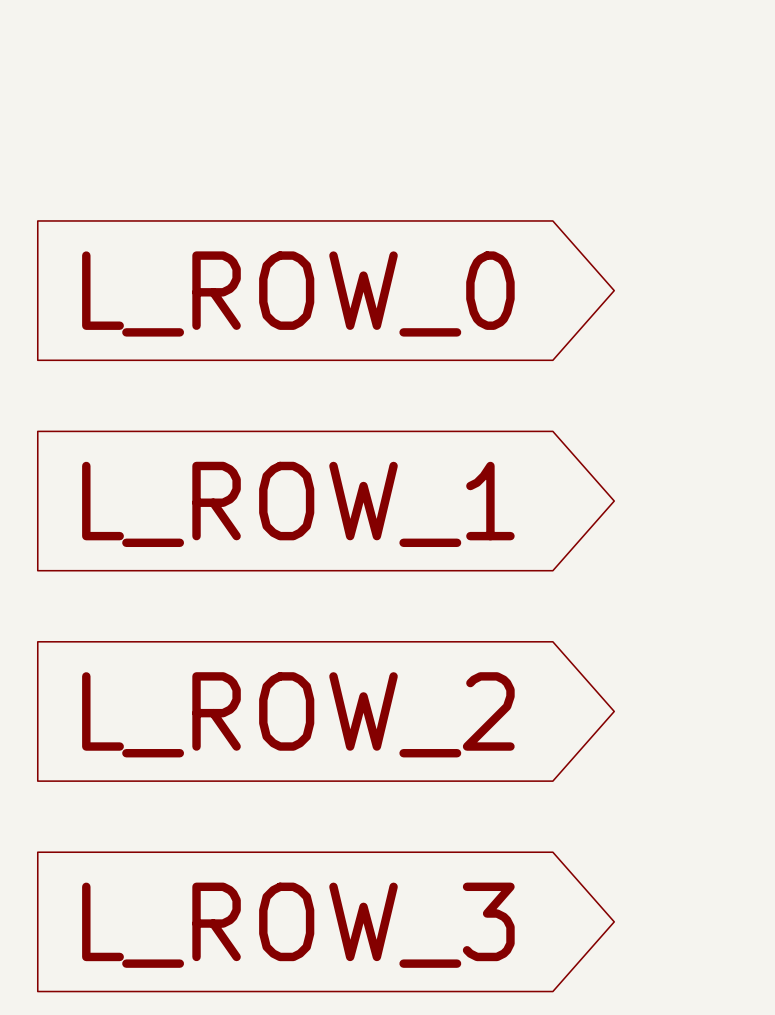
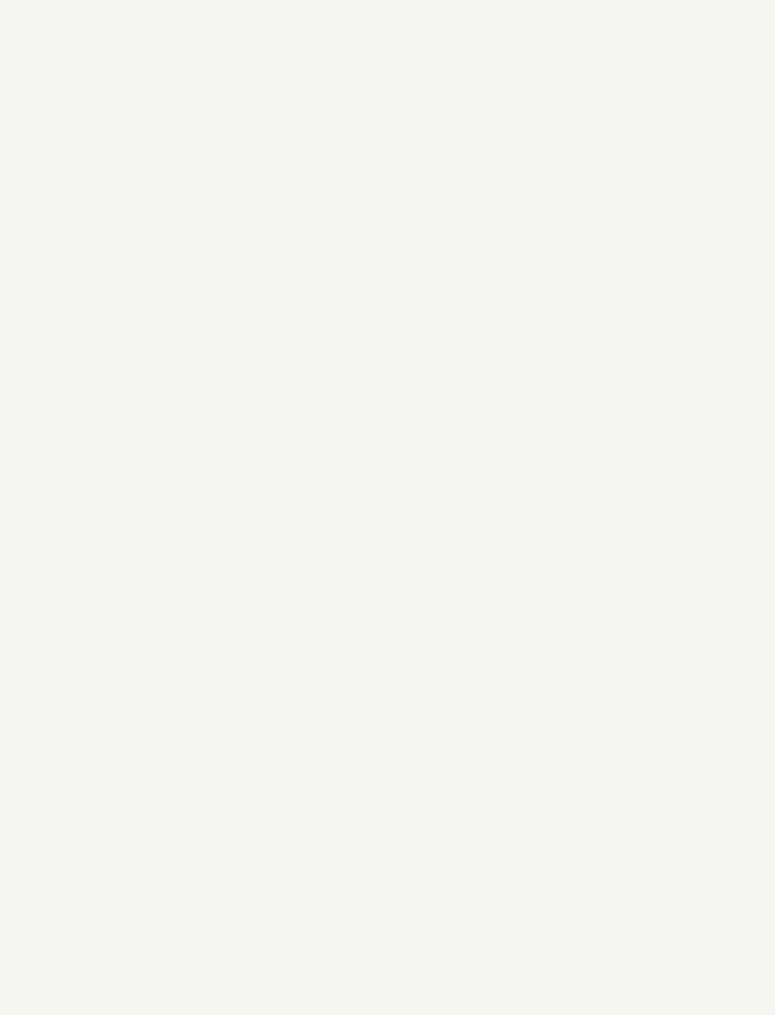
global label: L_ROW_0 (298, 293) -> none
global label: L_ROW_1 (298, 504) -> none
global label: L_ROW_2 (298, 714) -> none
global label: L_ROW_3 (298, 925) -> none

